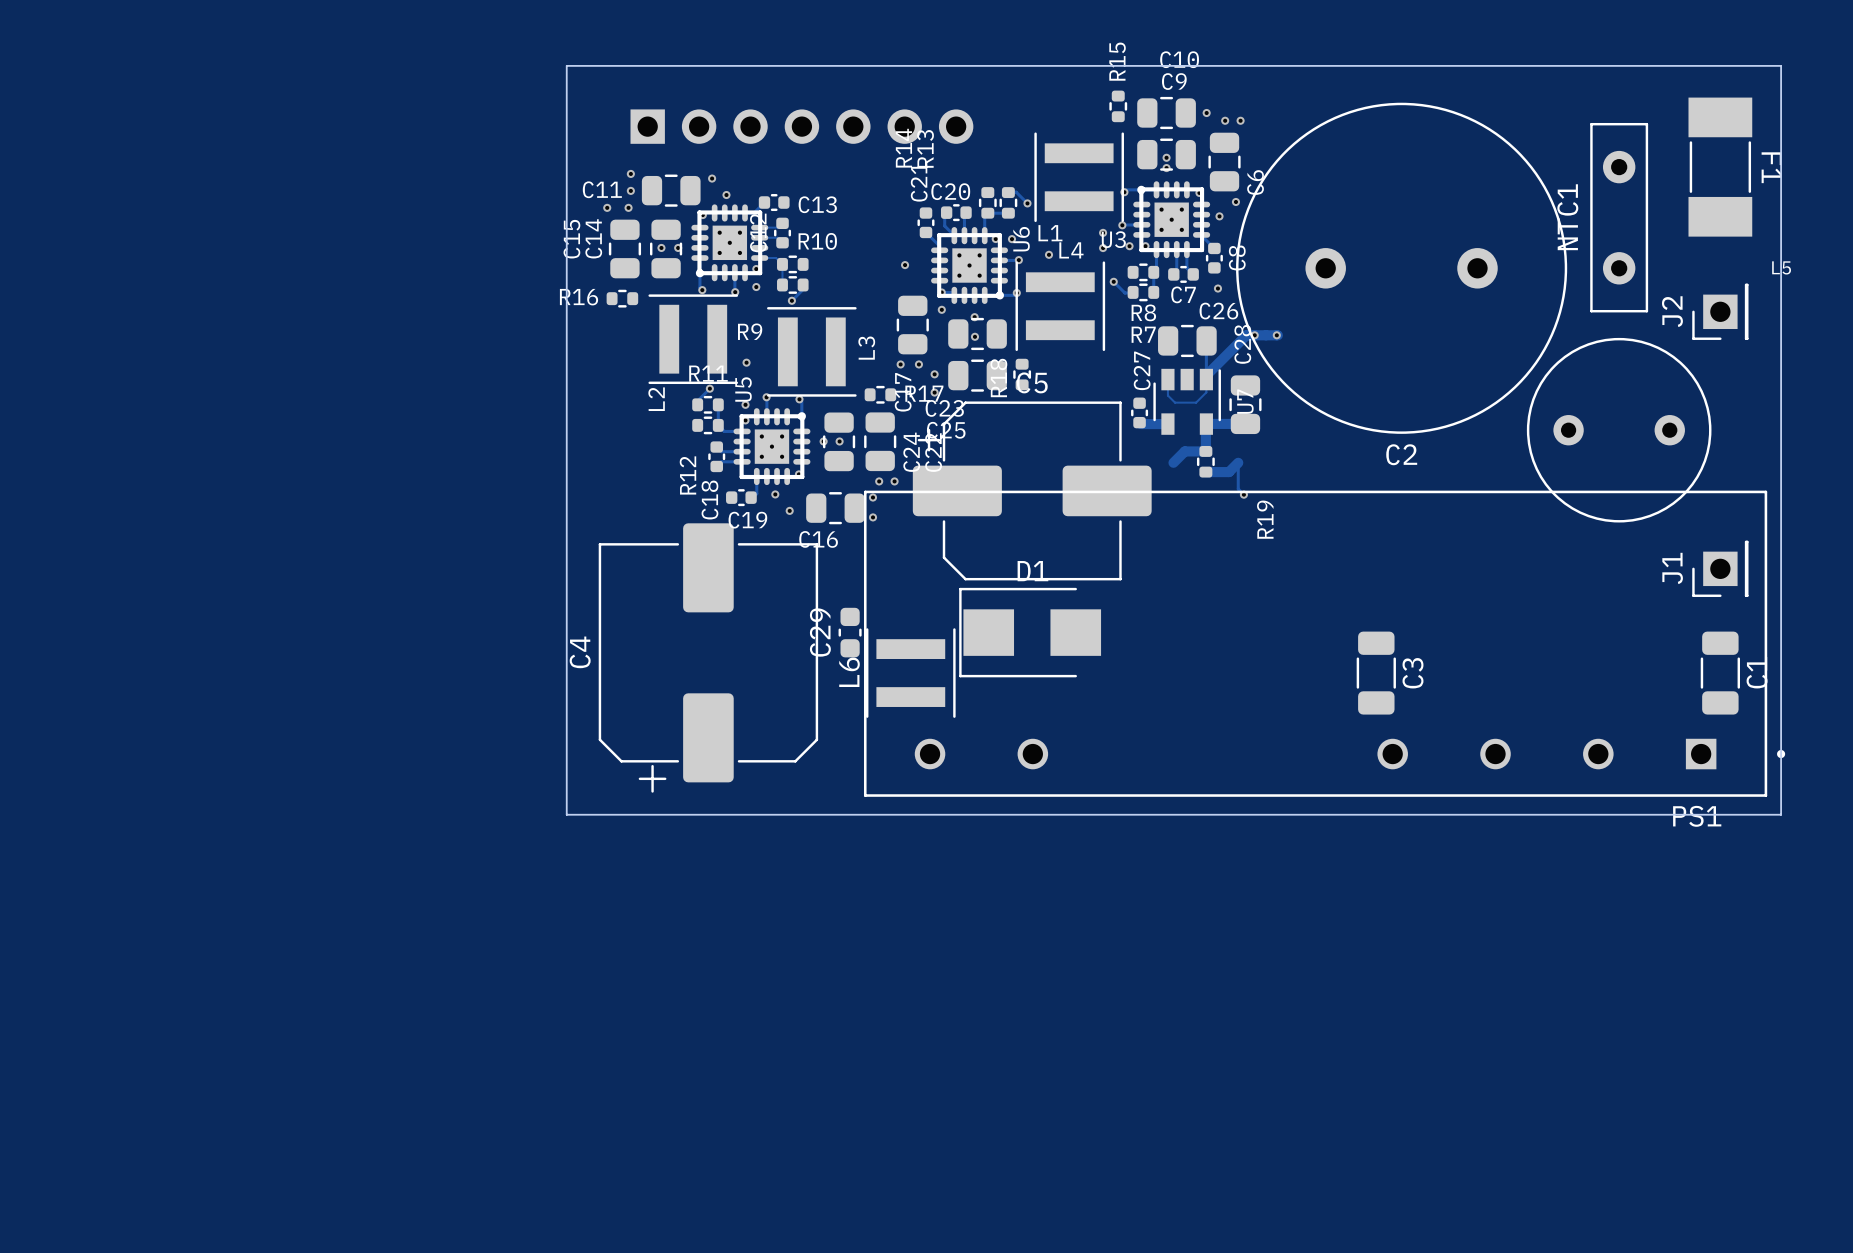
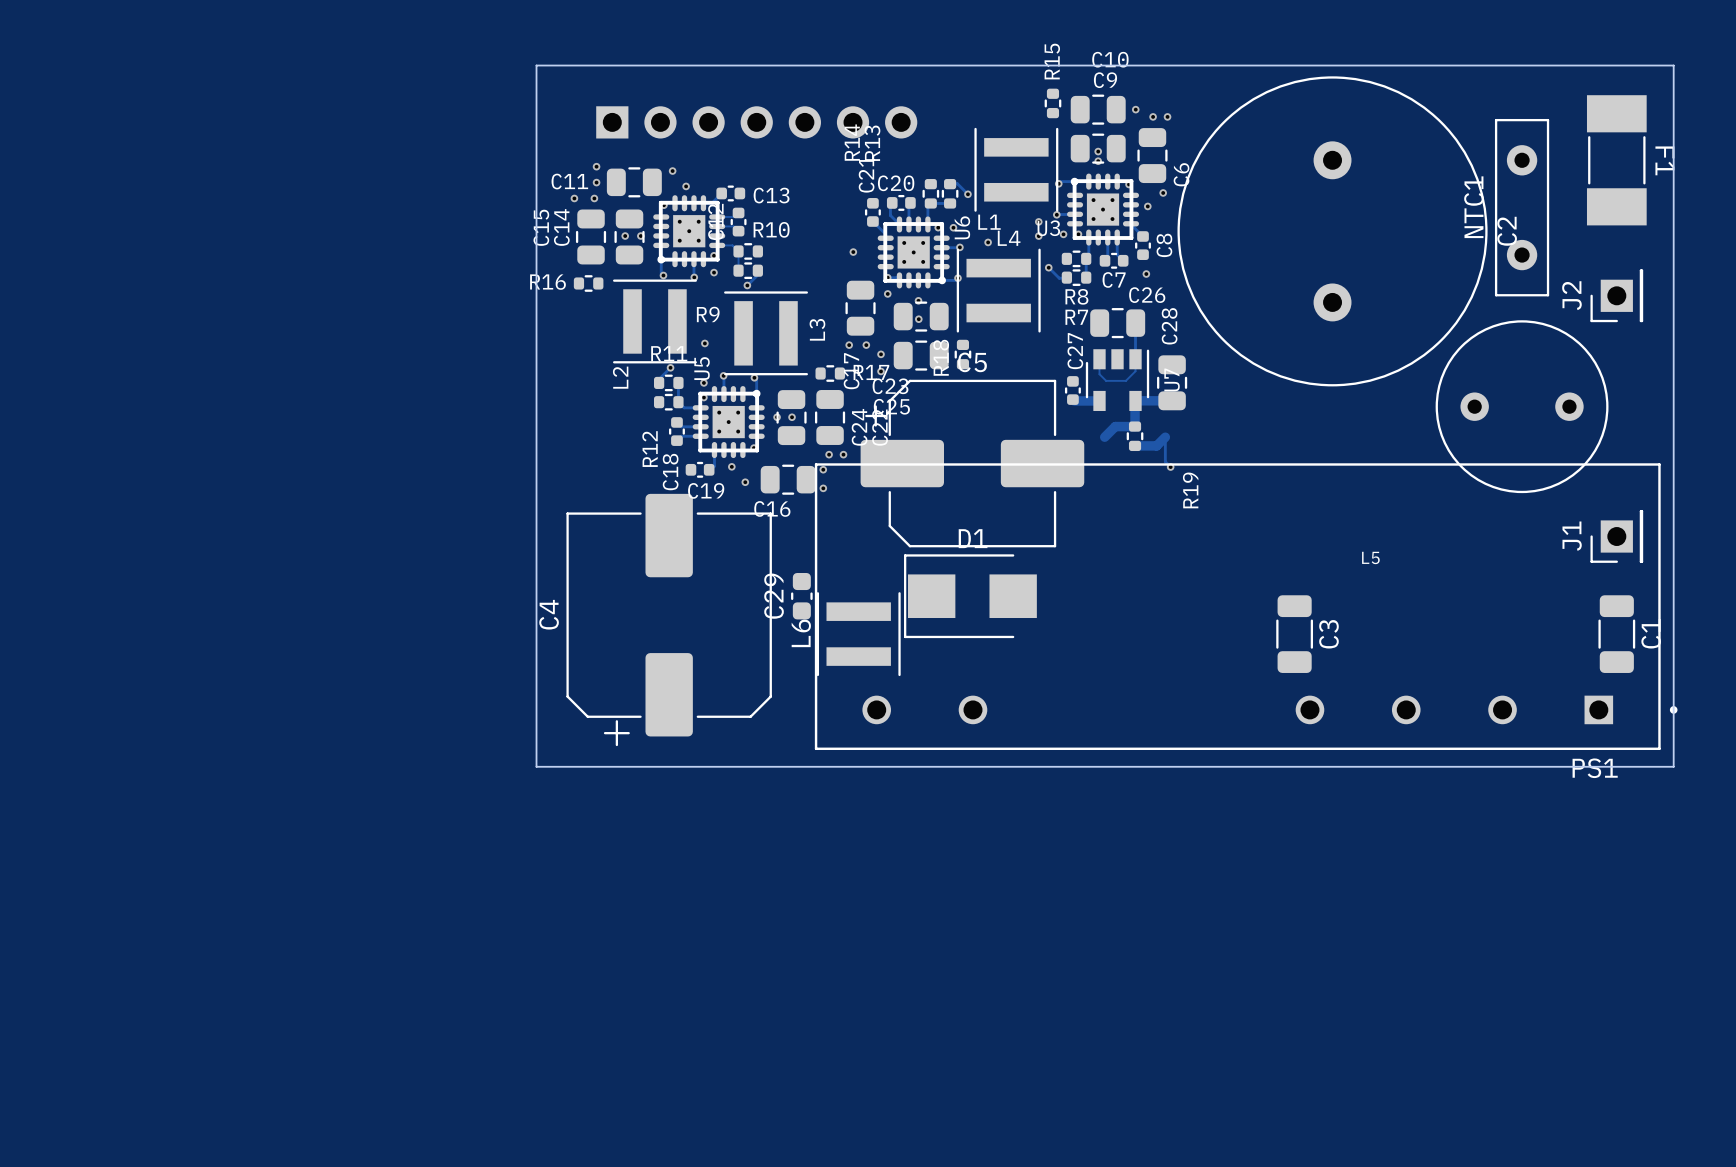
L5 name position: L5 (1781, 267) -> L5 (1370, 557)
C2 rotation: 0° (1401, 268) -> 90° clockwise (1332, 231)
via: (1254, 335) -> none
via: (1276, 335) -> none
track: (1277, 335) (1246, 335) (1206, 375) -> none
C2 name position: C2 (1401, 454) -> C2 (1507, 231)

